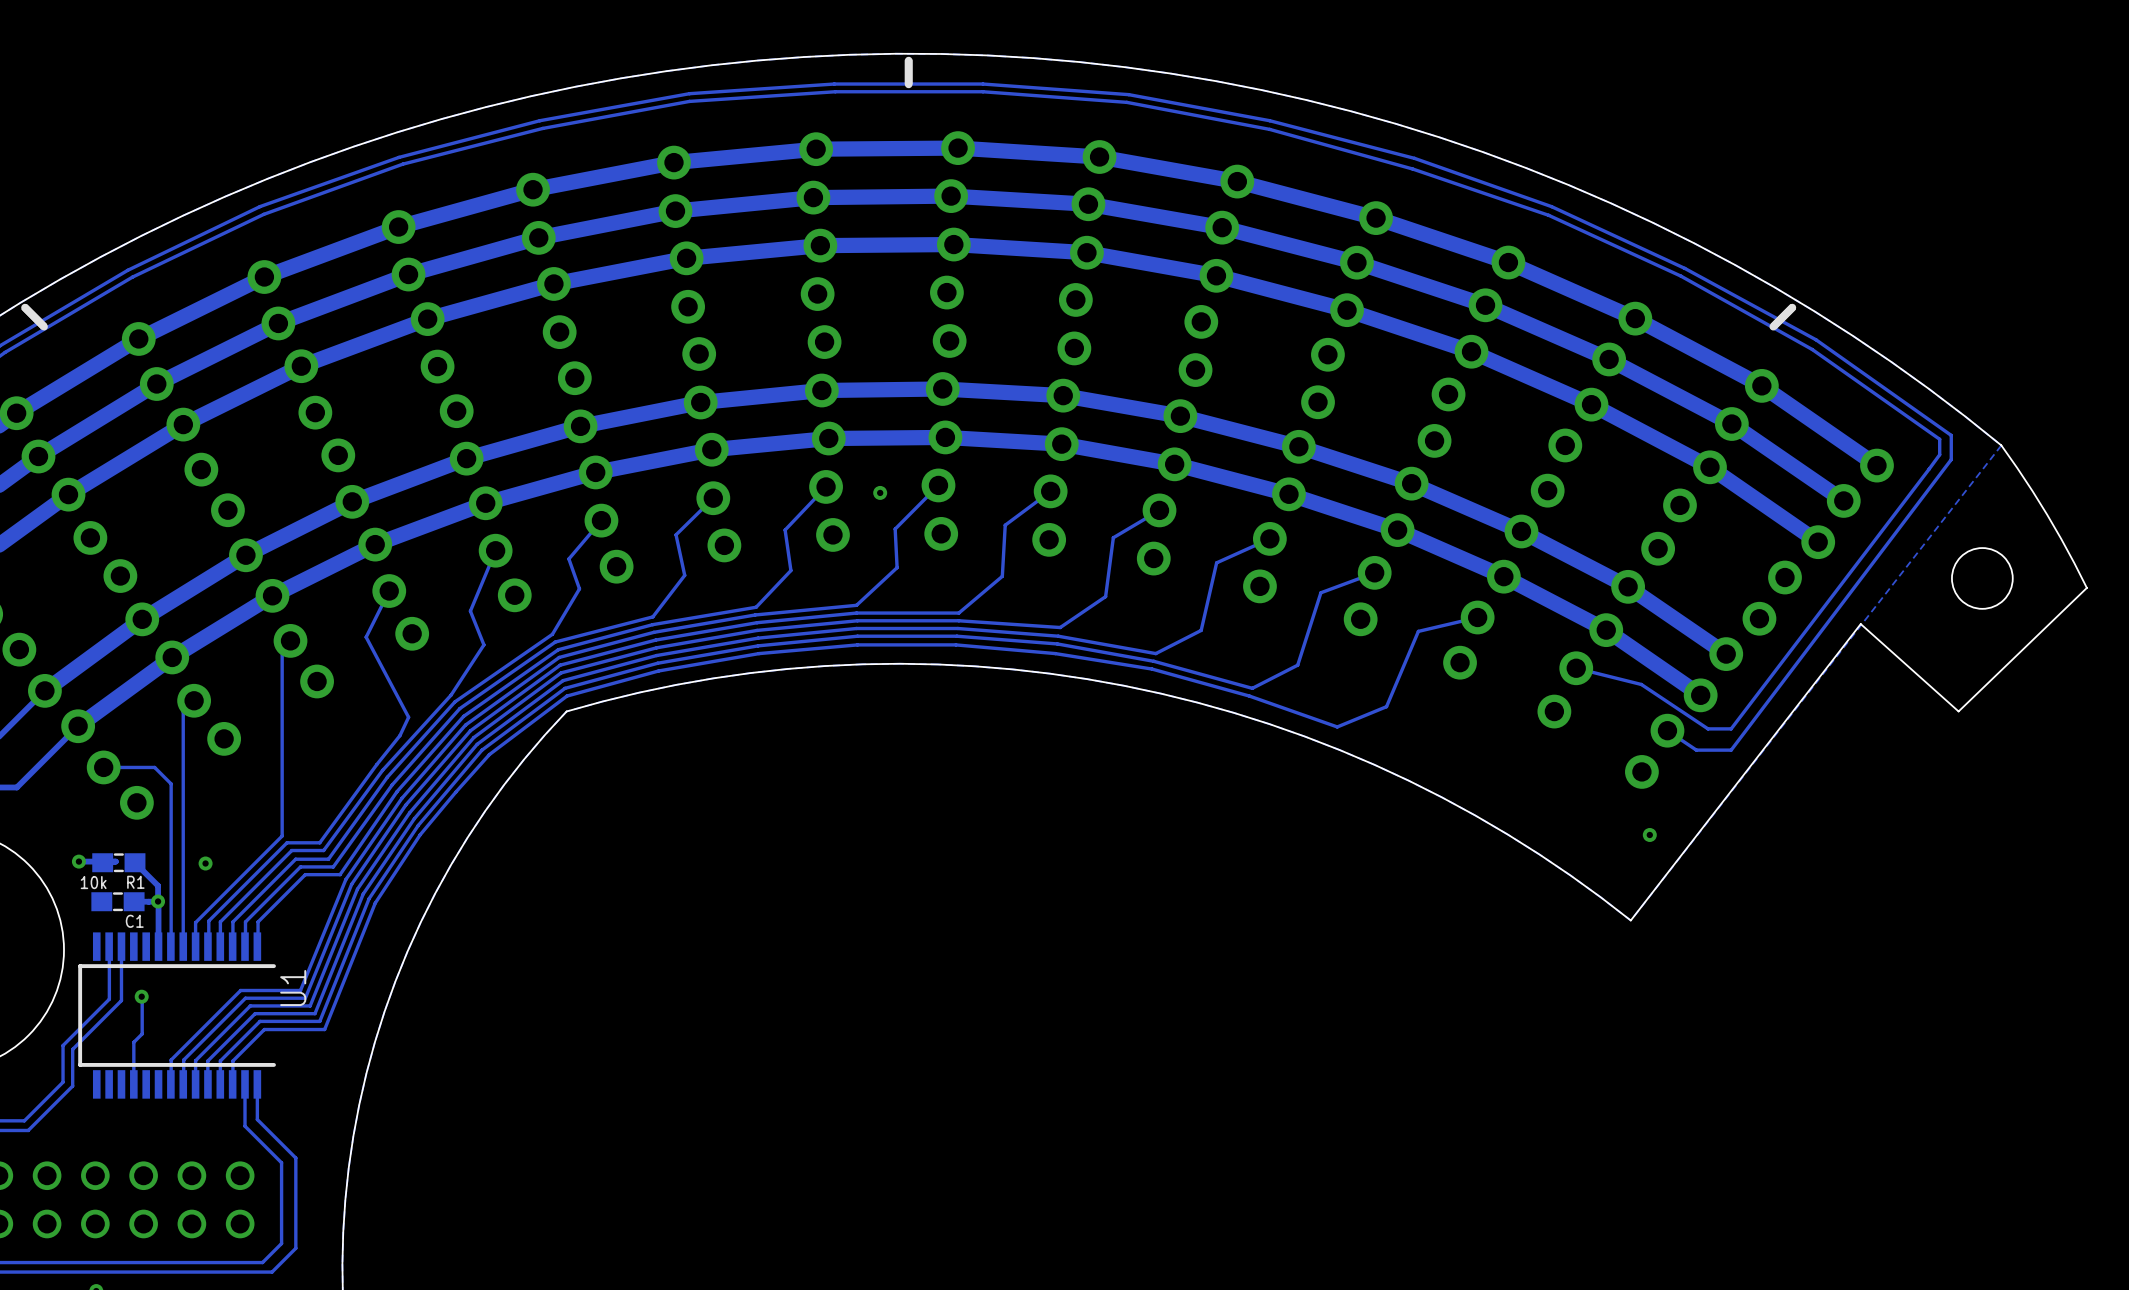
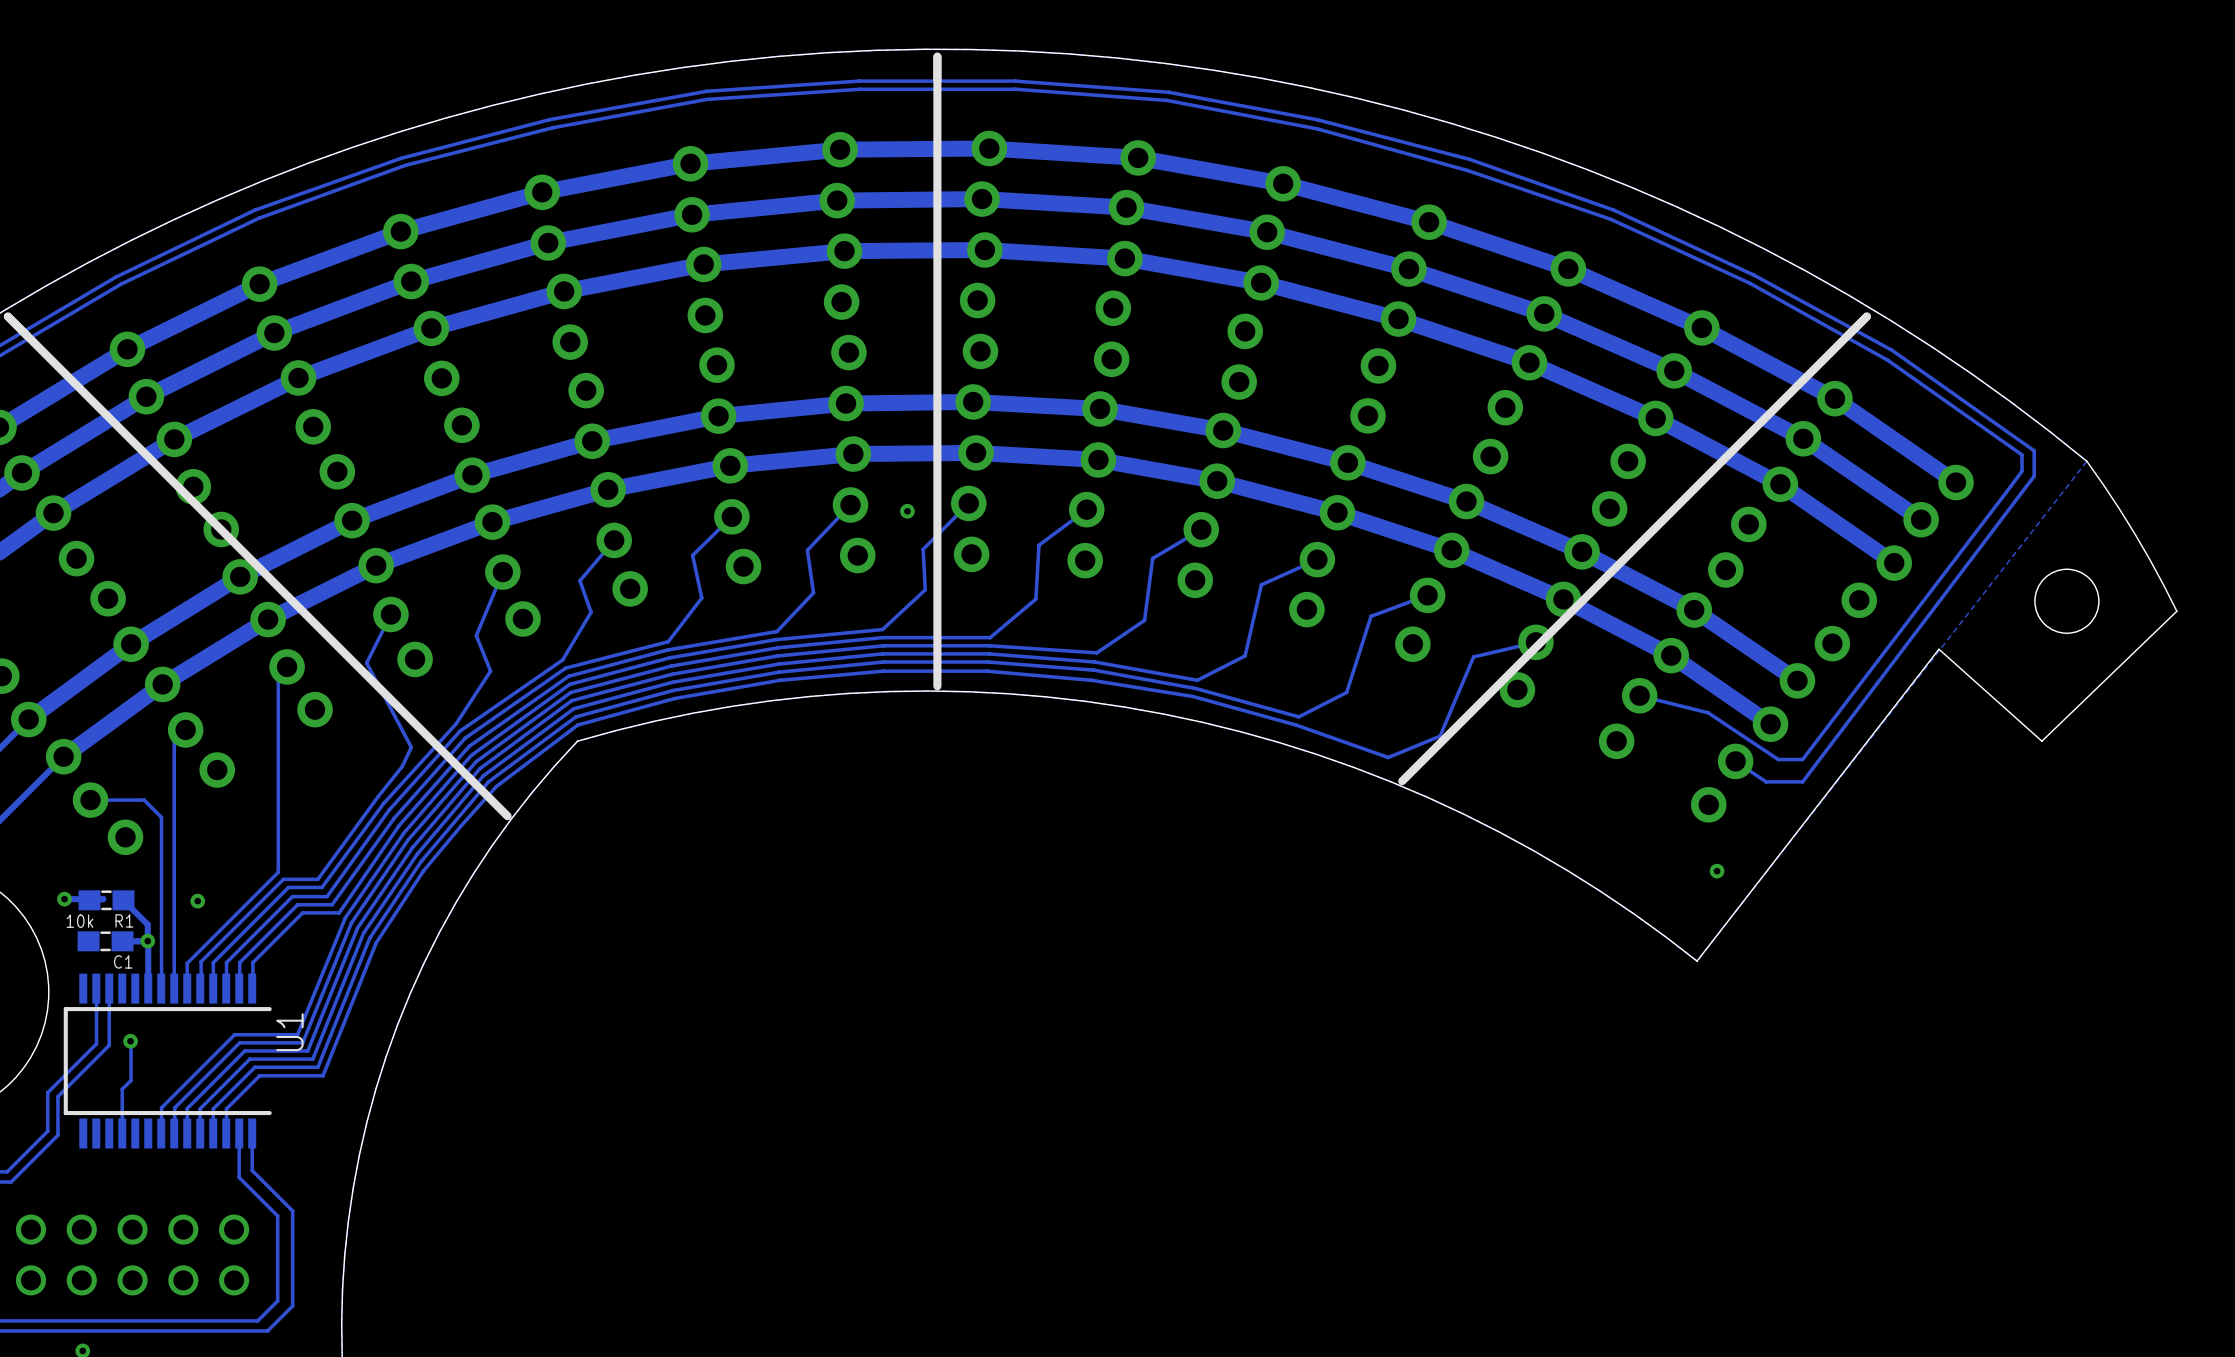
line: none -> (937, 81) (937, 686)
line: none -> (27, 336) (507, 816)
line: none -> (1847, 336) (1402, 781)

